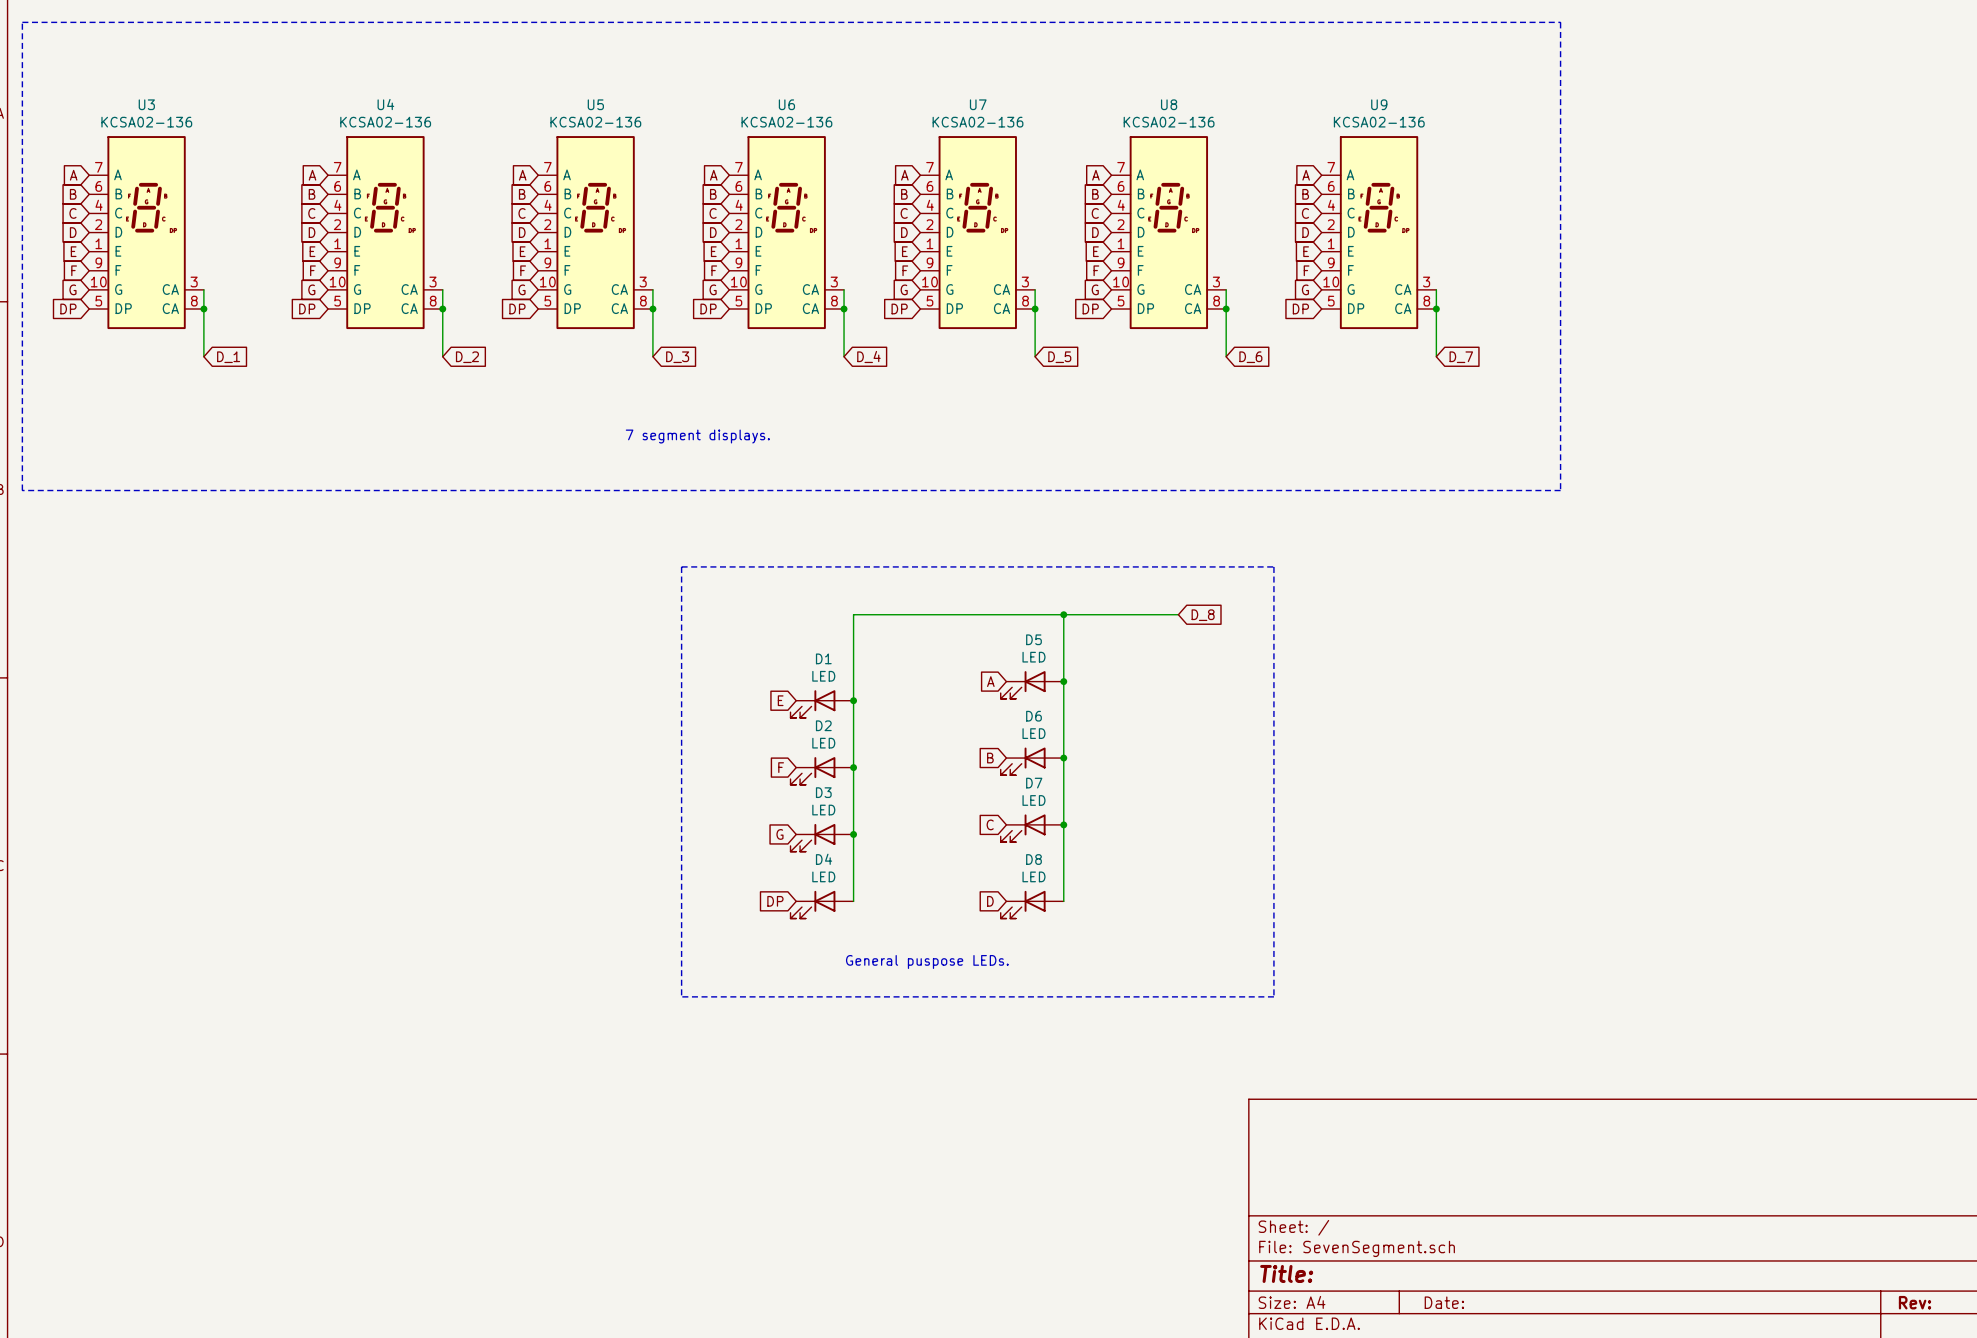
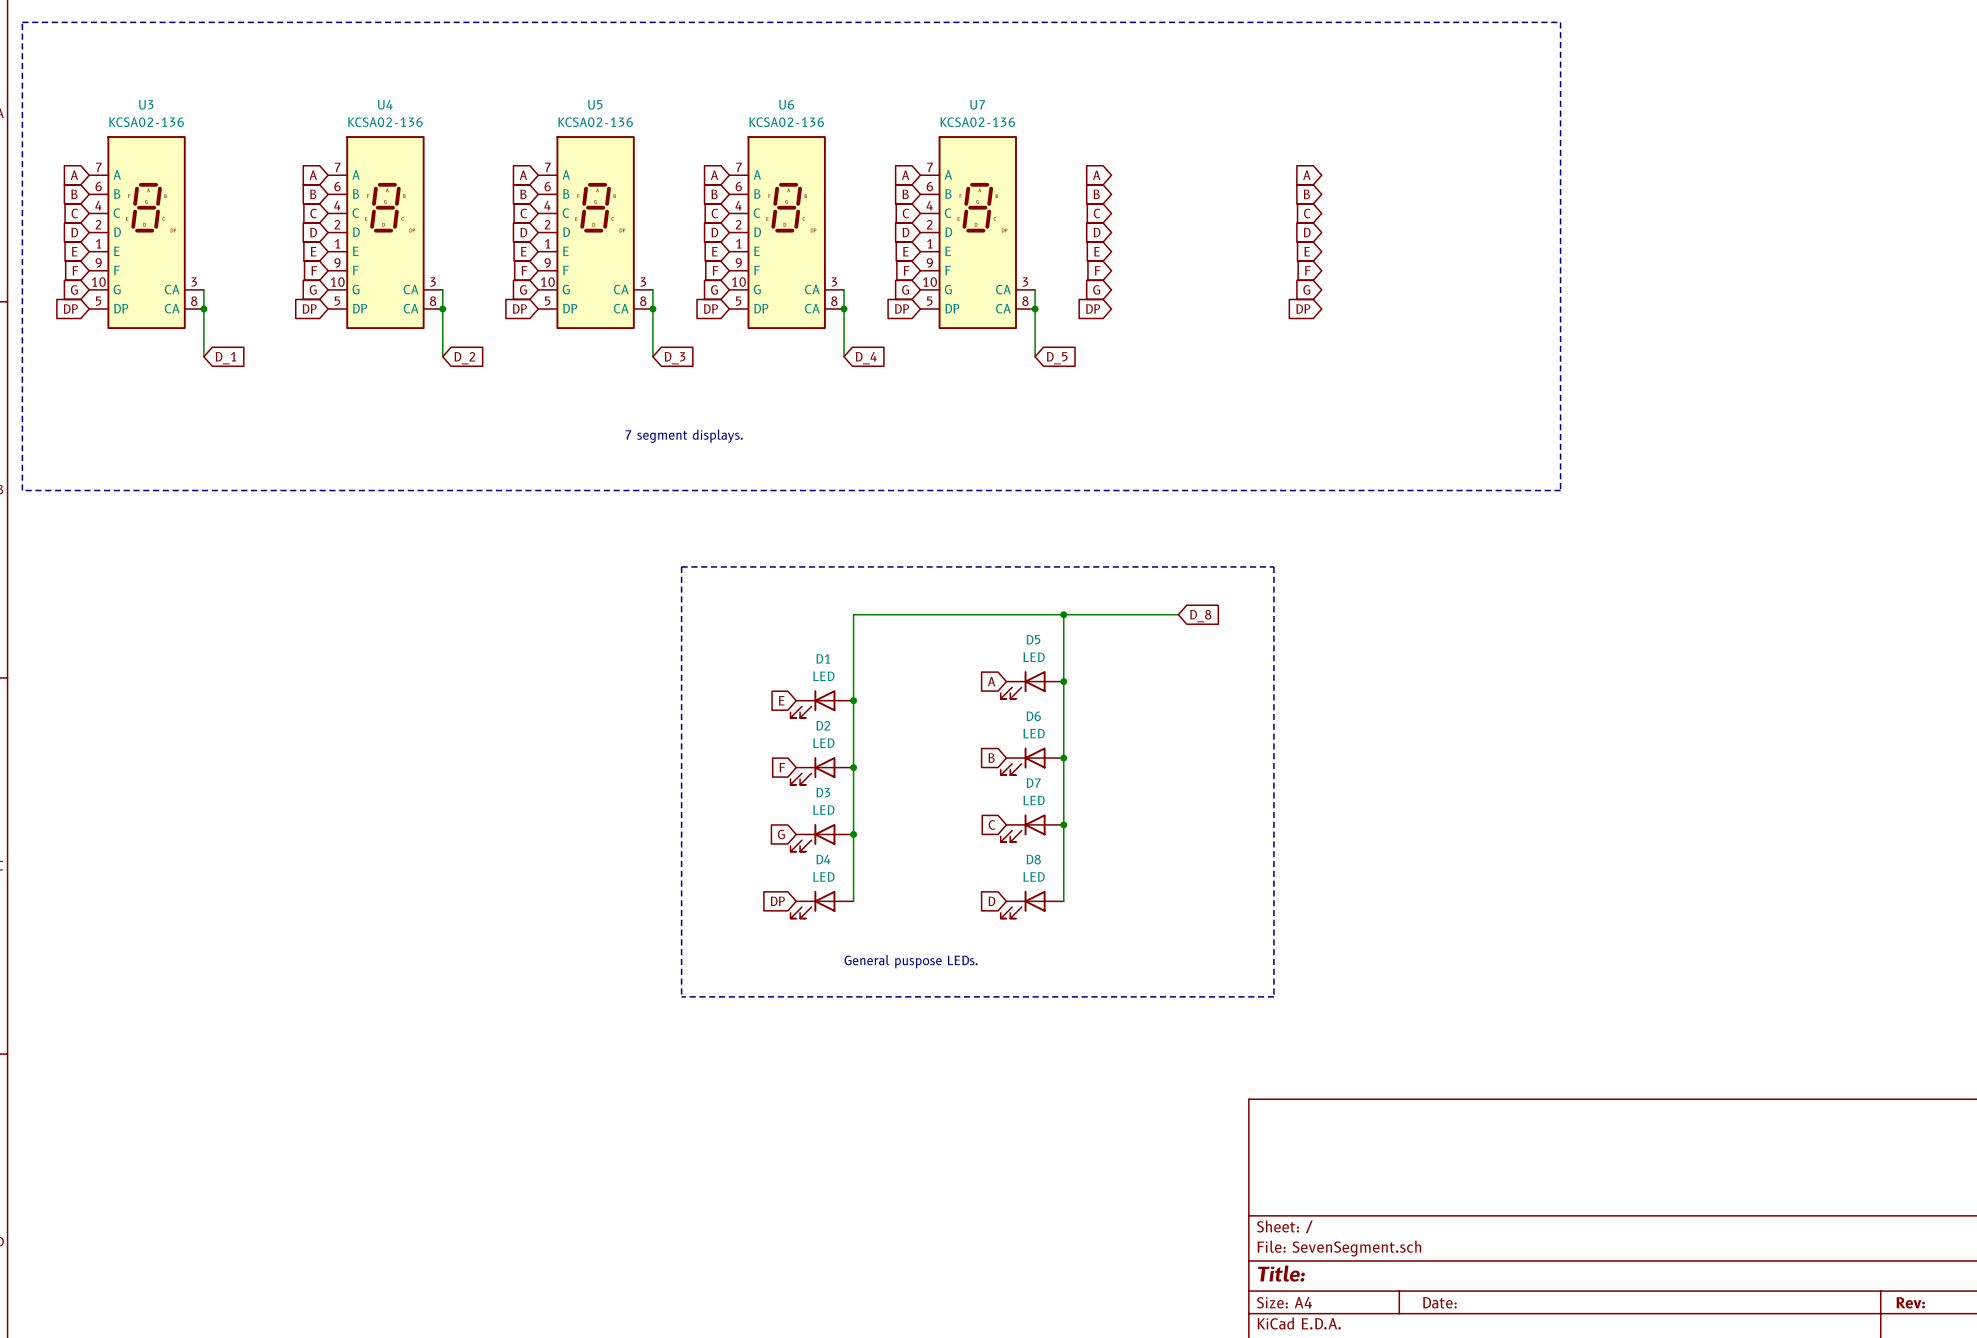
U8: KCSA02-136 (1168, 232) -> none
U9: KCSA02-136 (1379, 232) -> none
wire: (1226, 289) (1226, 356) -> none
wire: (1436, 289) (1436, 356) -> none
junction: (1226, 308) -> none
junction: (1436, 308) -> none
global label: D_6 (1250, 357) -> none
global label: D_7 (1461, 357) -> none

